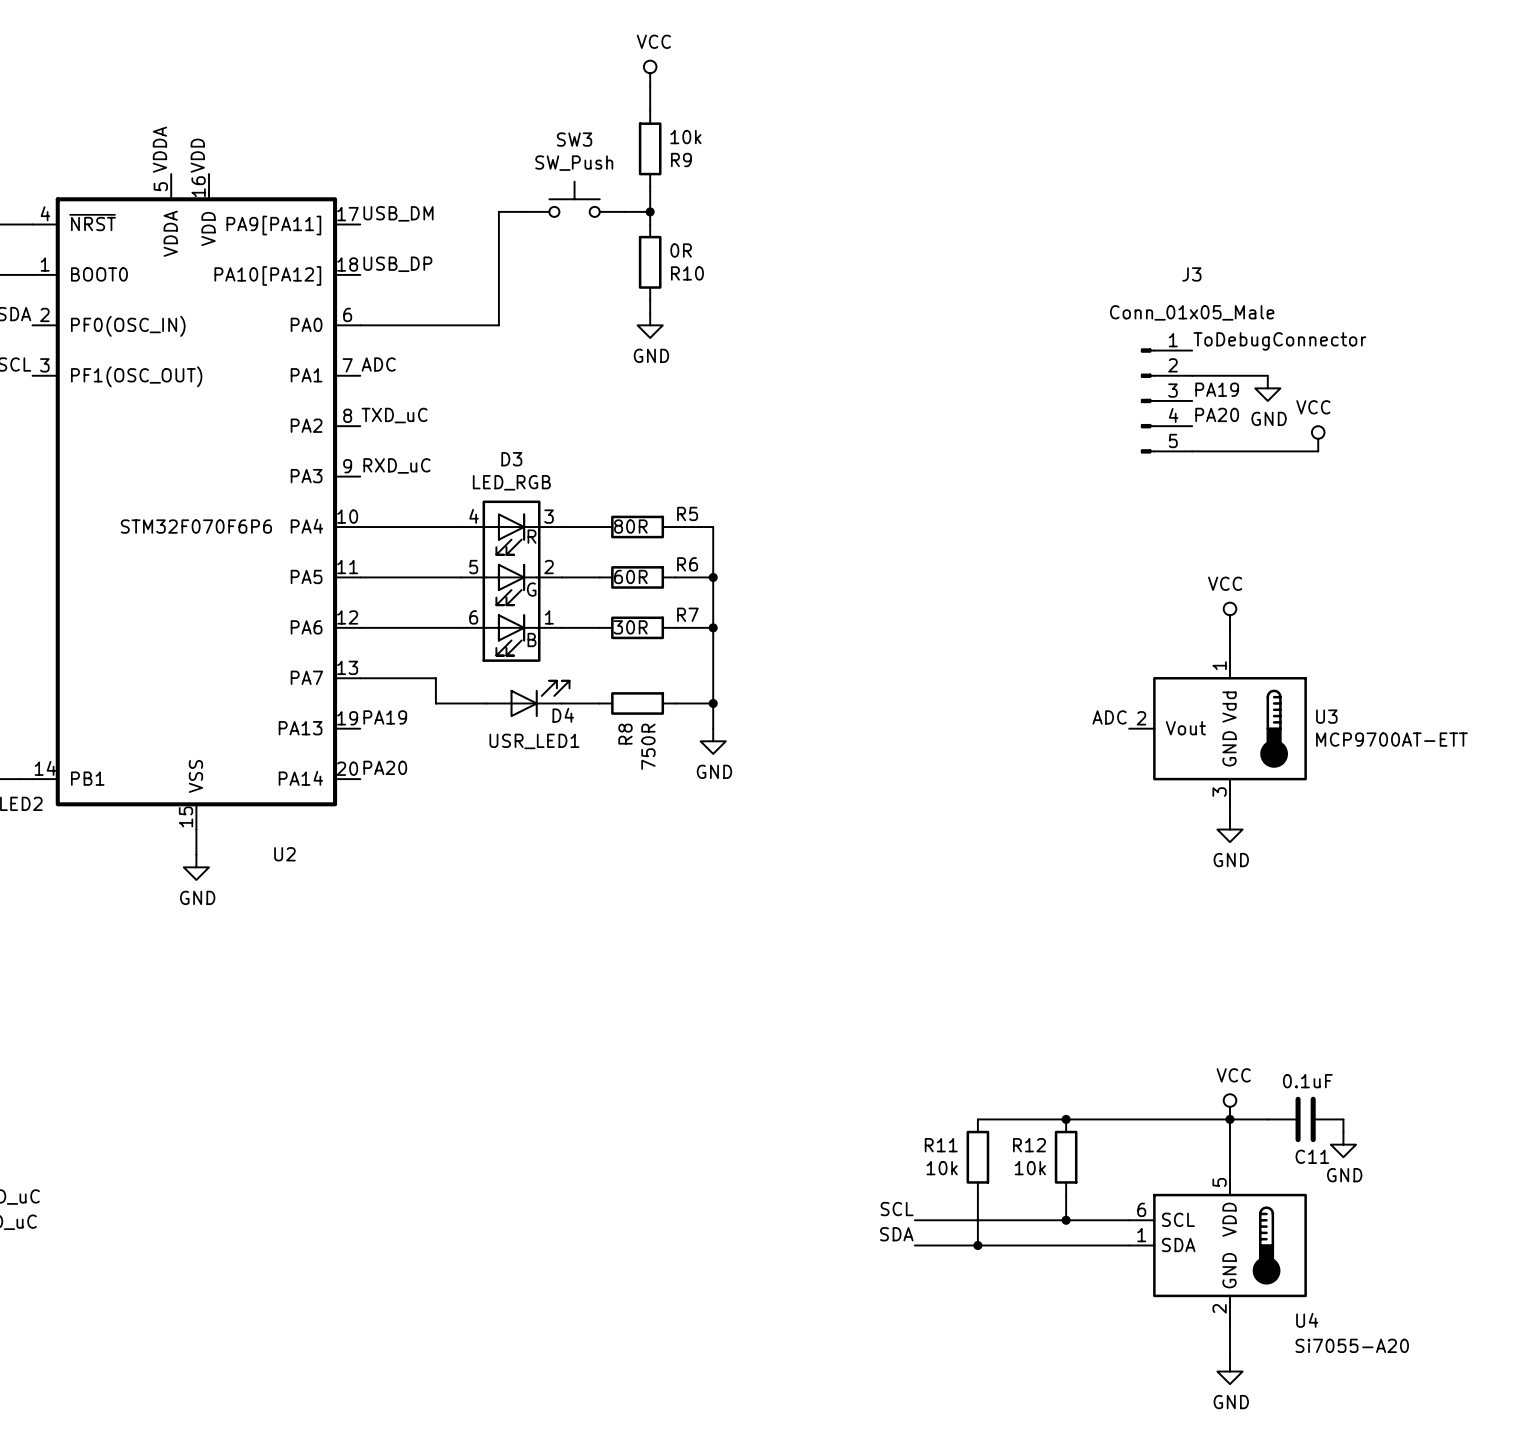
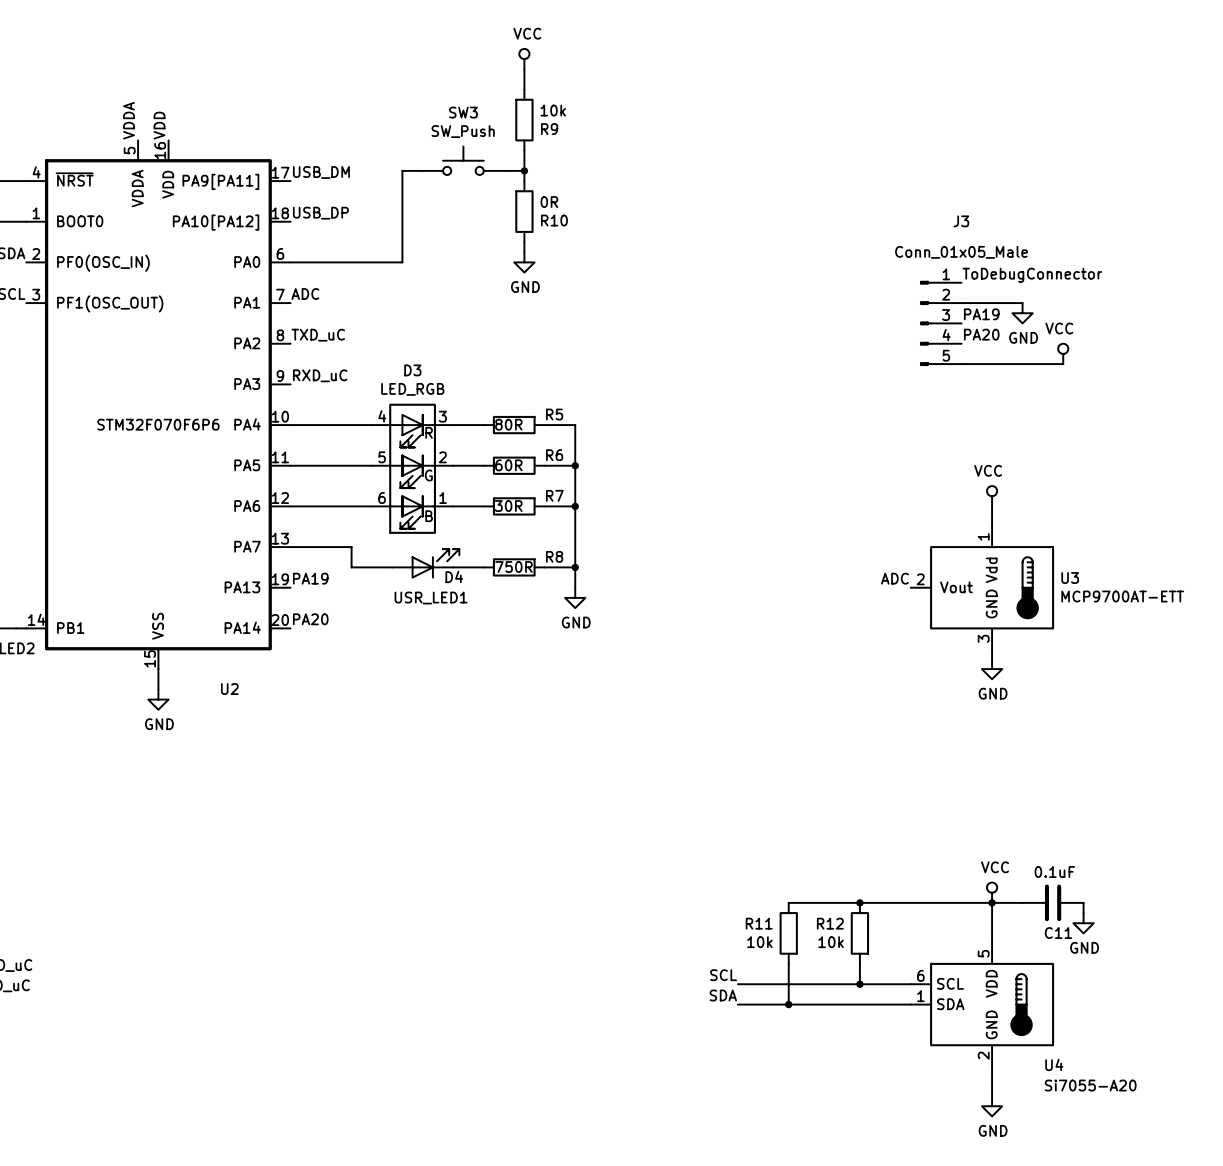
R8 name rotation: 0° (625, 734) -> 90° clockwise (554, 556)
R8 name position: R8 (625, 734) -> R8 (554, 556)
R8 value rotation: 0° (648, 746) -> 90° clockwise (513, 567)

